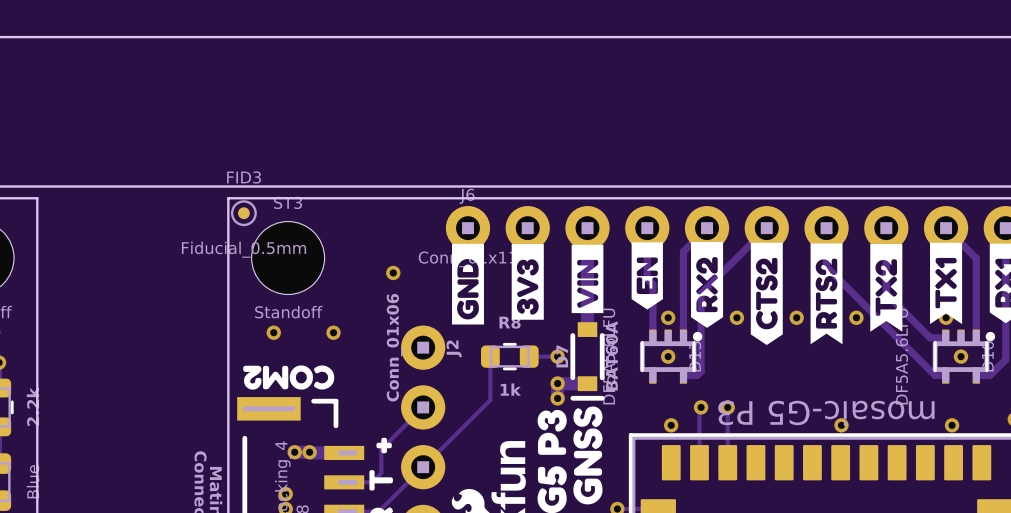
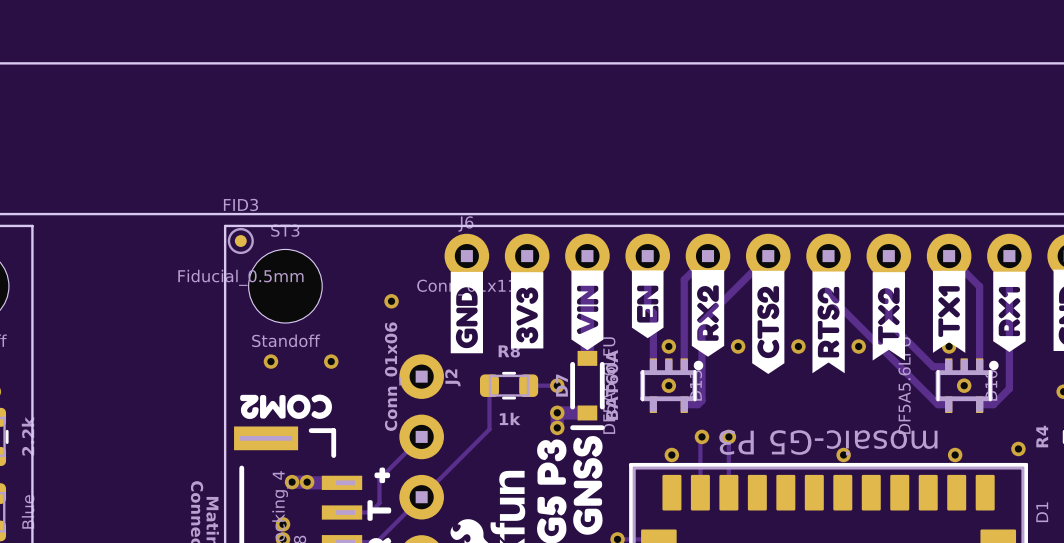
drawing shape: [571, 244, 604, 314] -> [571, 270, 604, 351]

